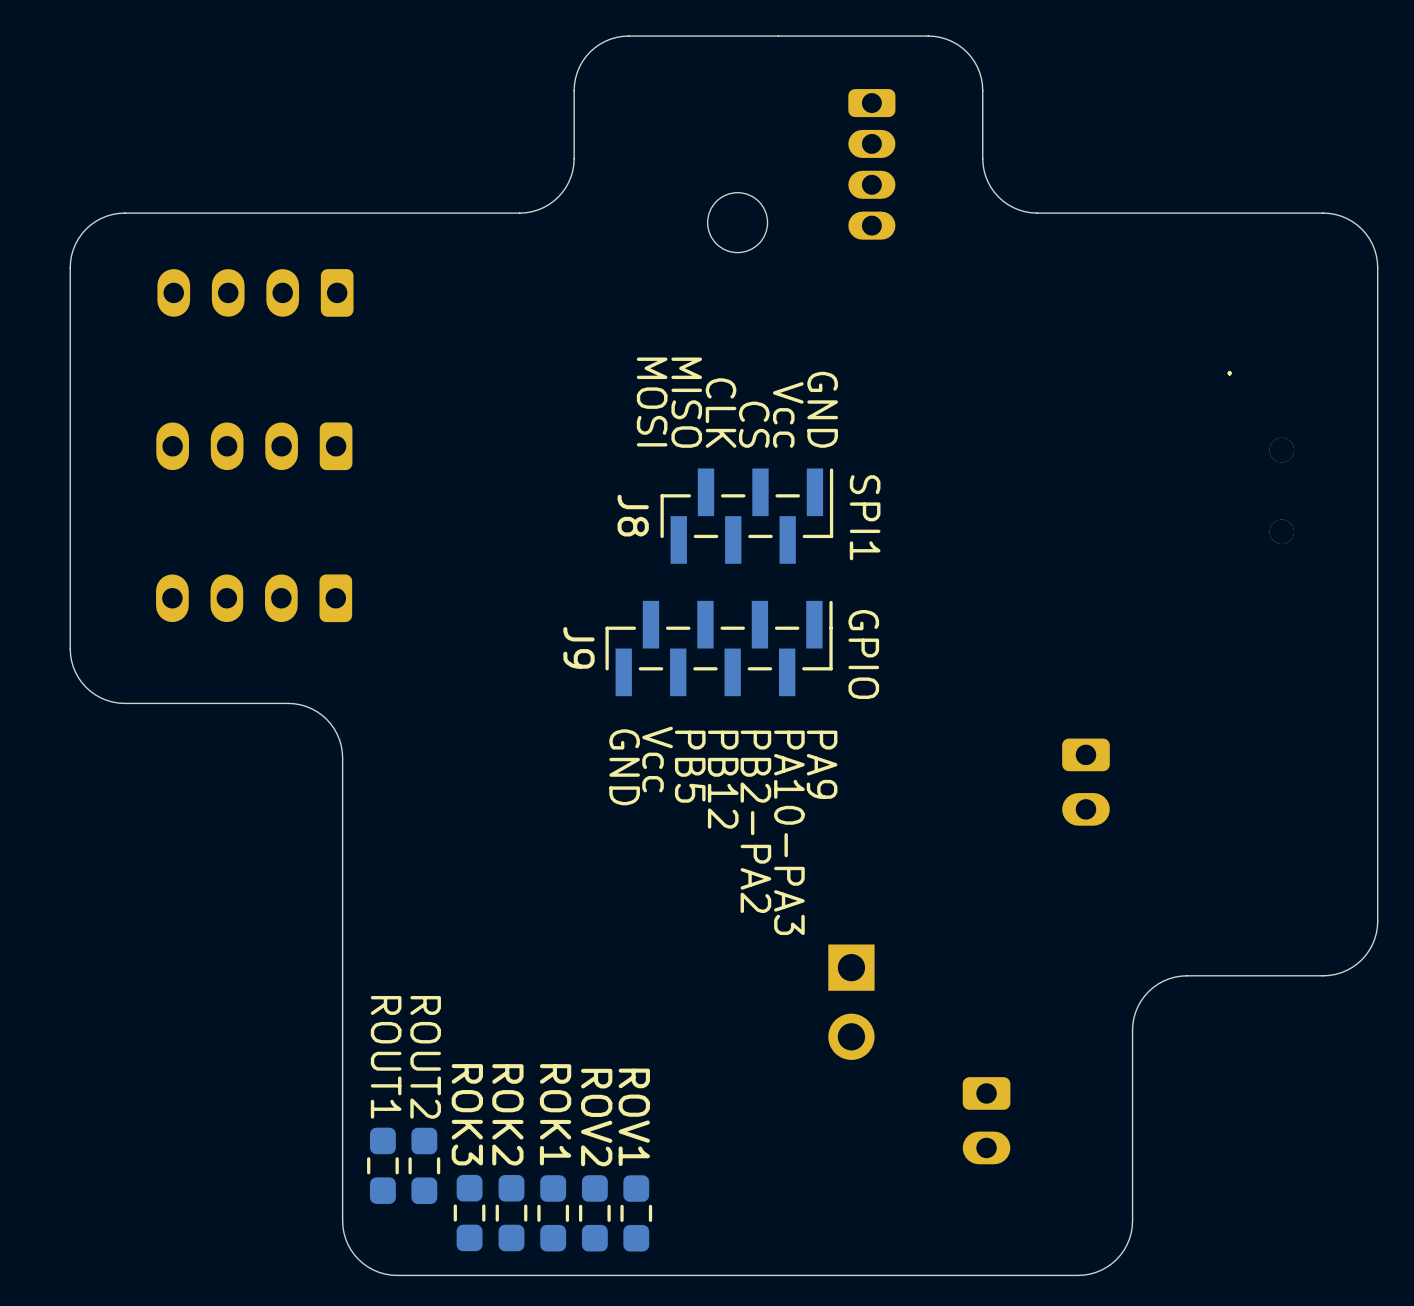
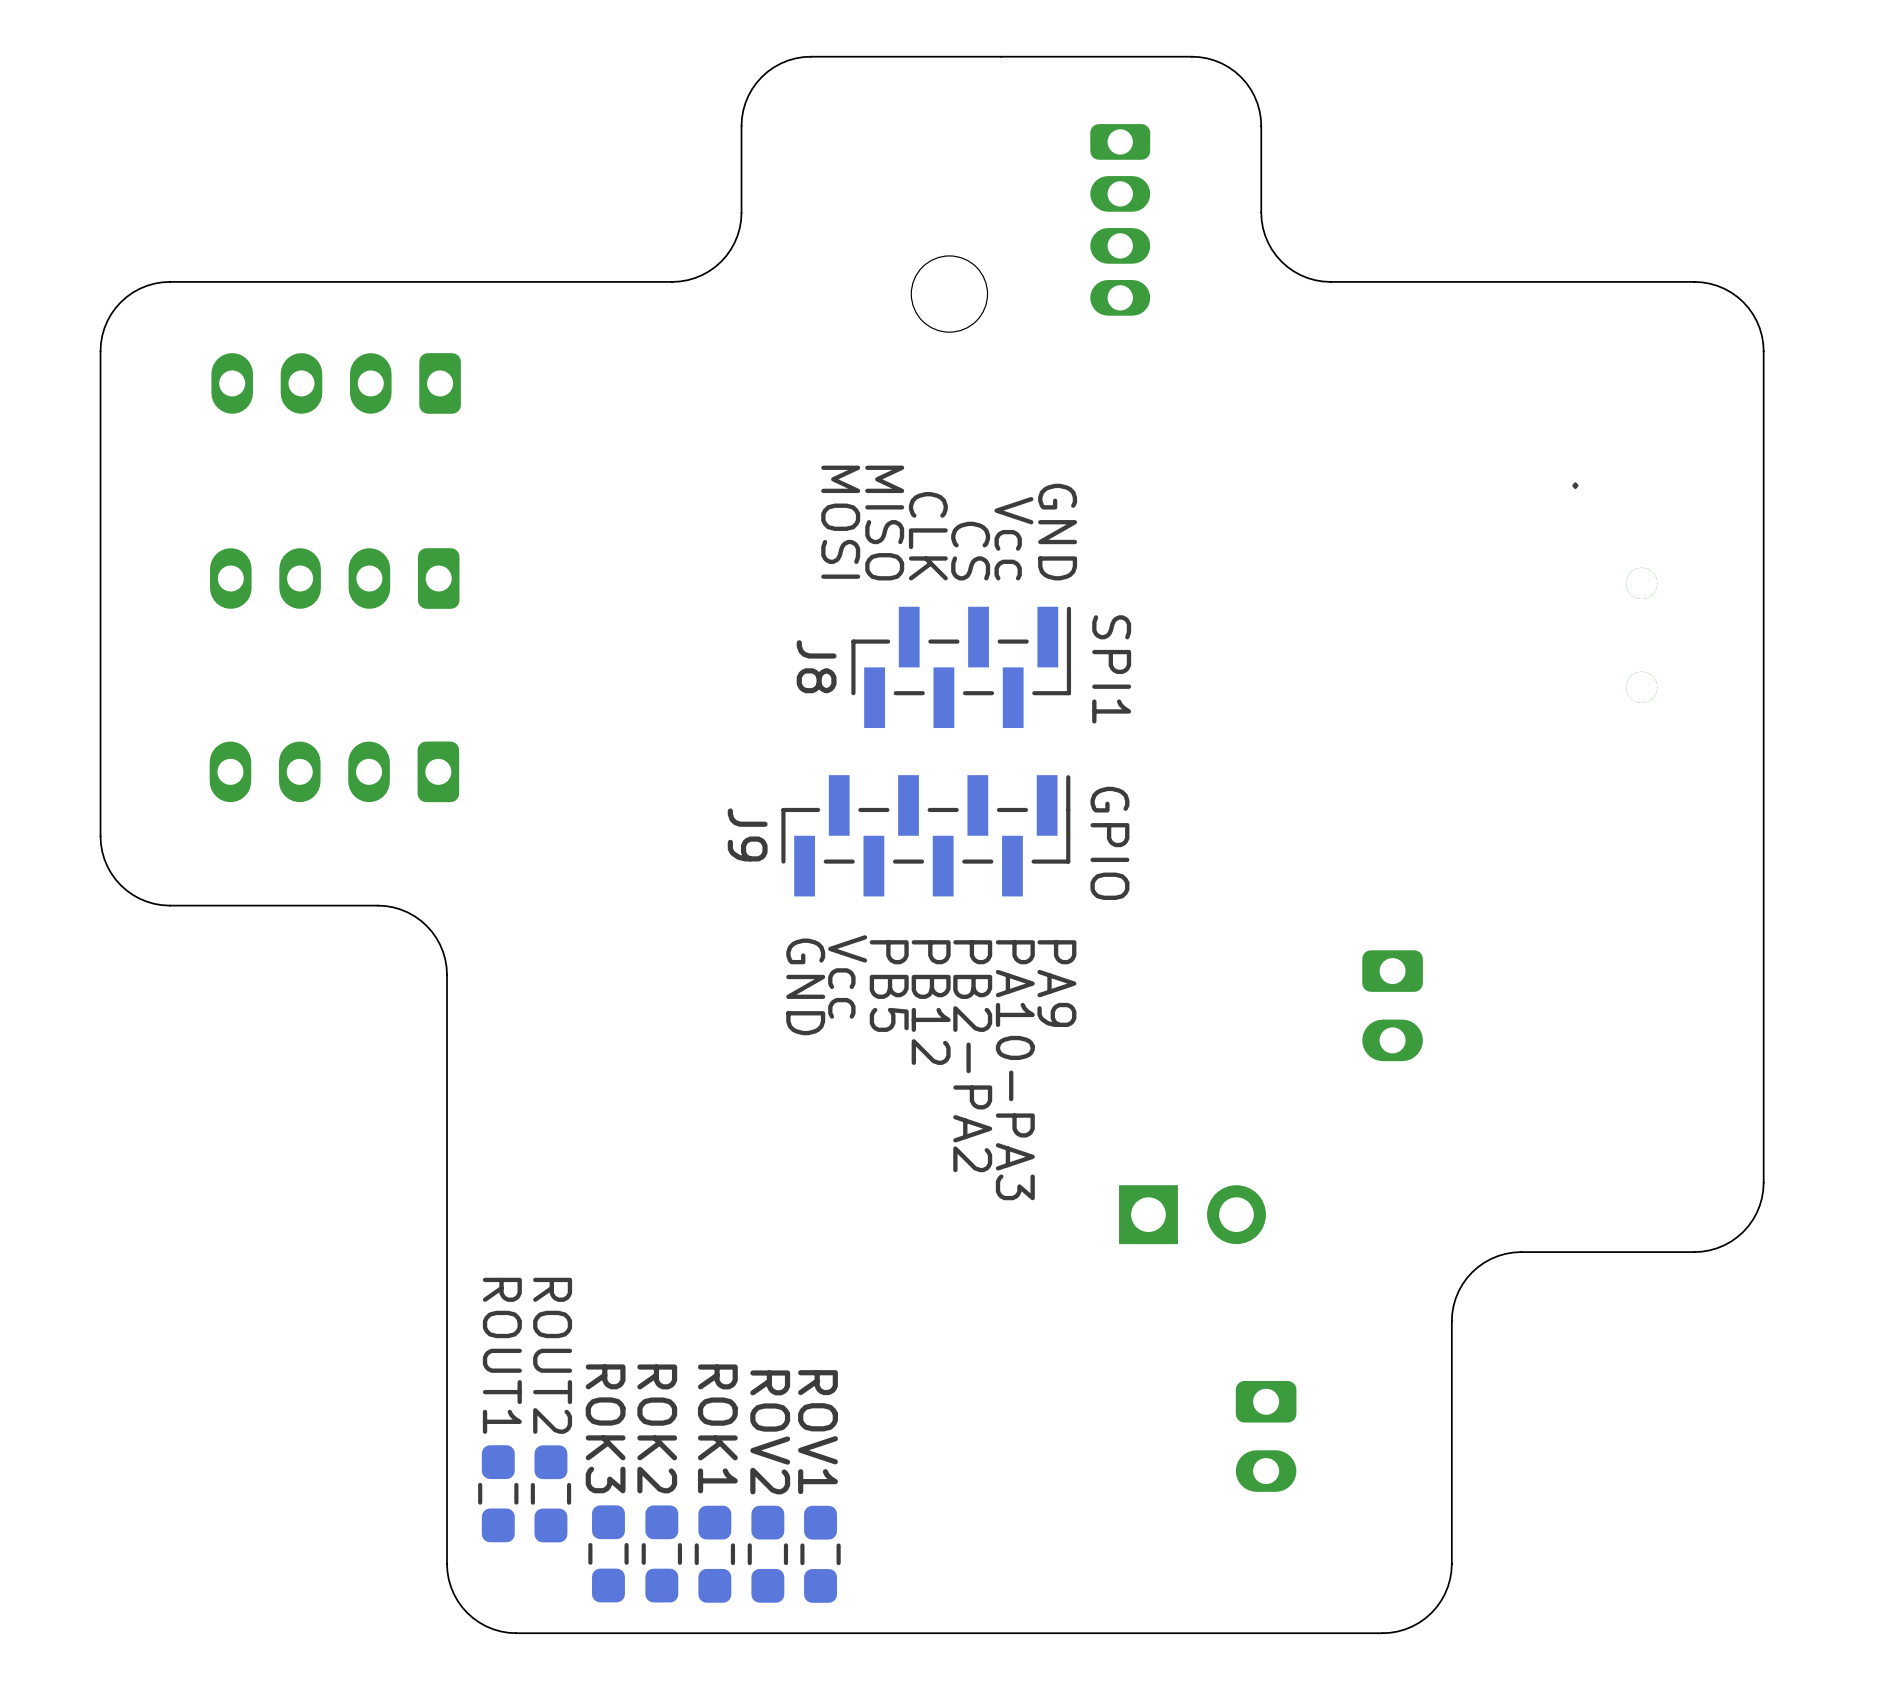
part rotation: 0° (851, 1002) -> 90° counterclockwise (1192, 1214)
part position: (851, 1002) -> (1192, 1214)

